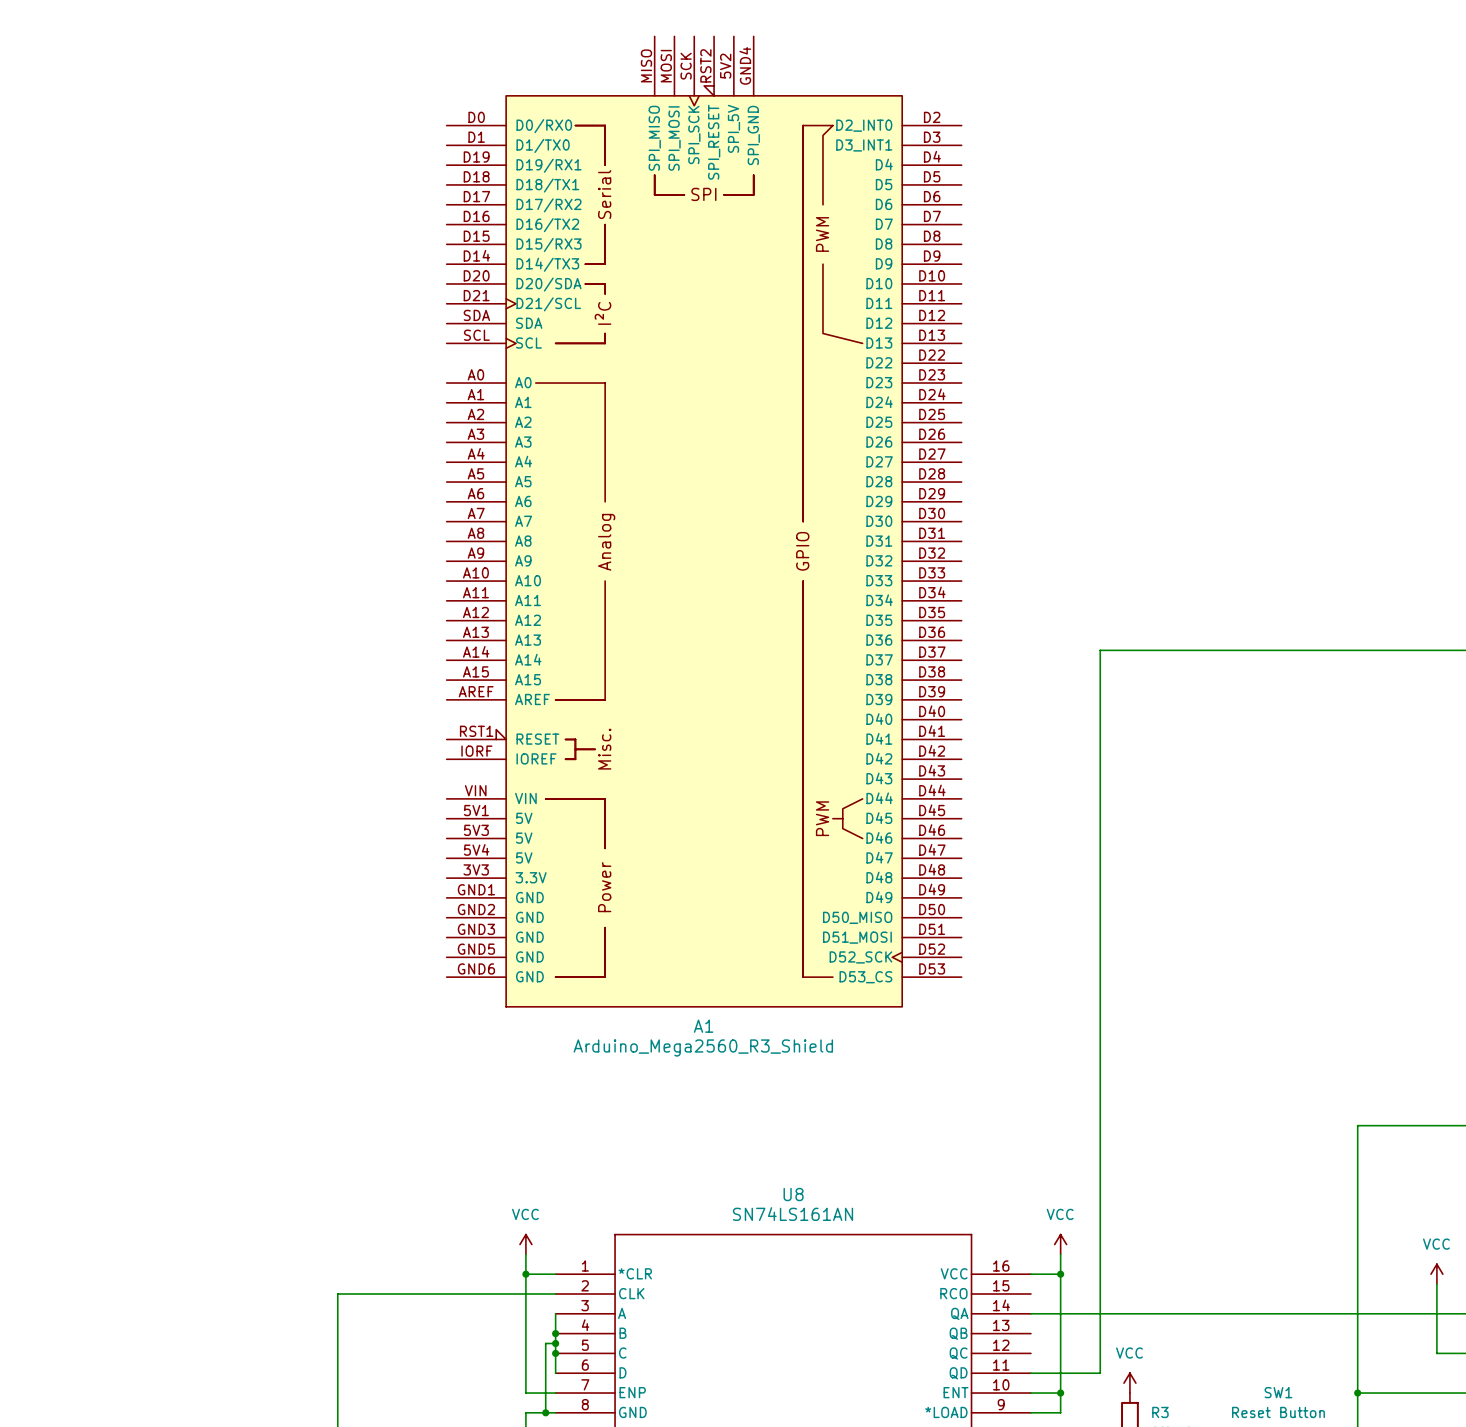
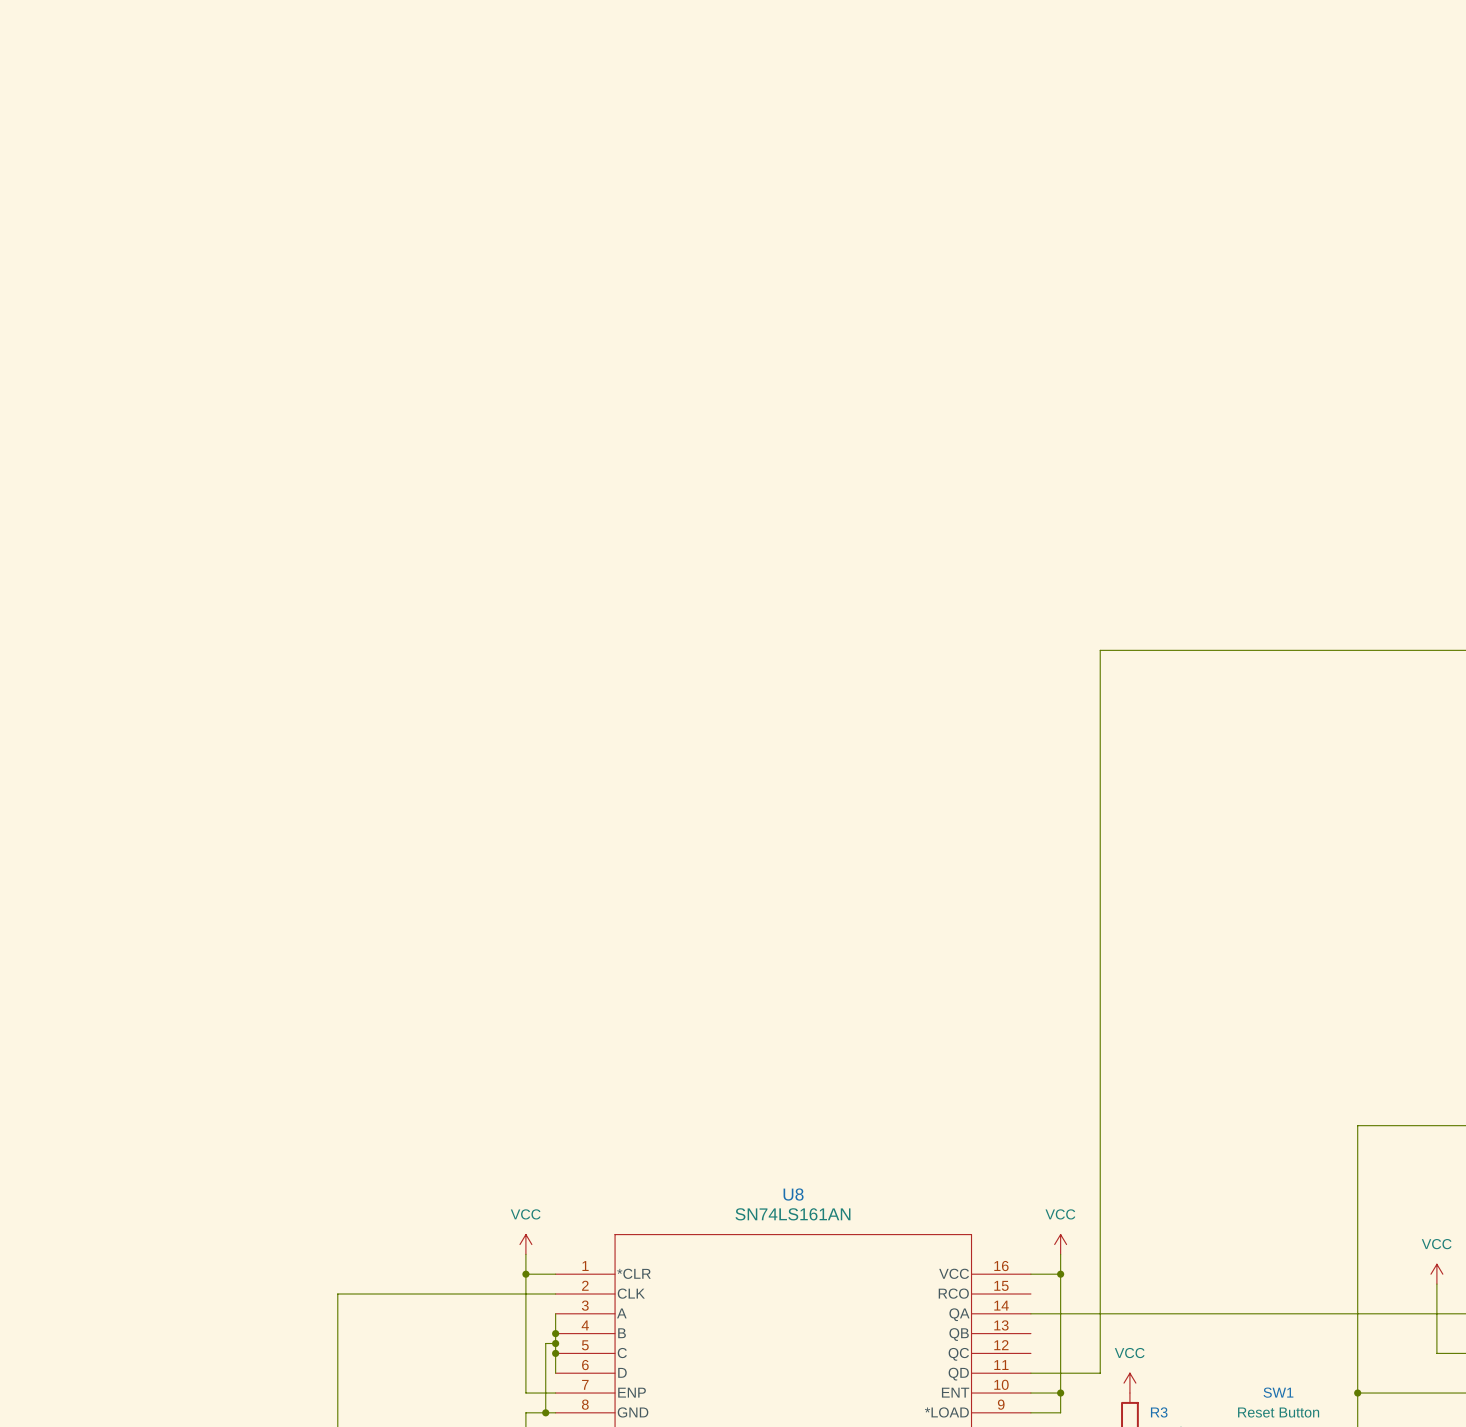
A1: Arduino_Mega2560_R3_Shield (704, 521) -> none

